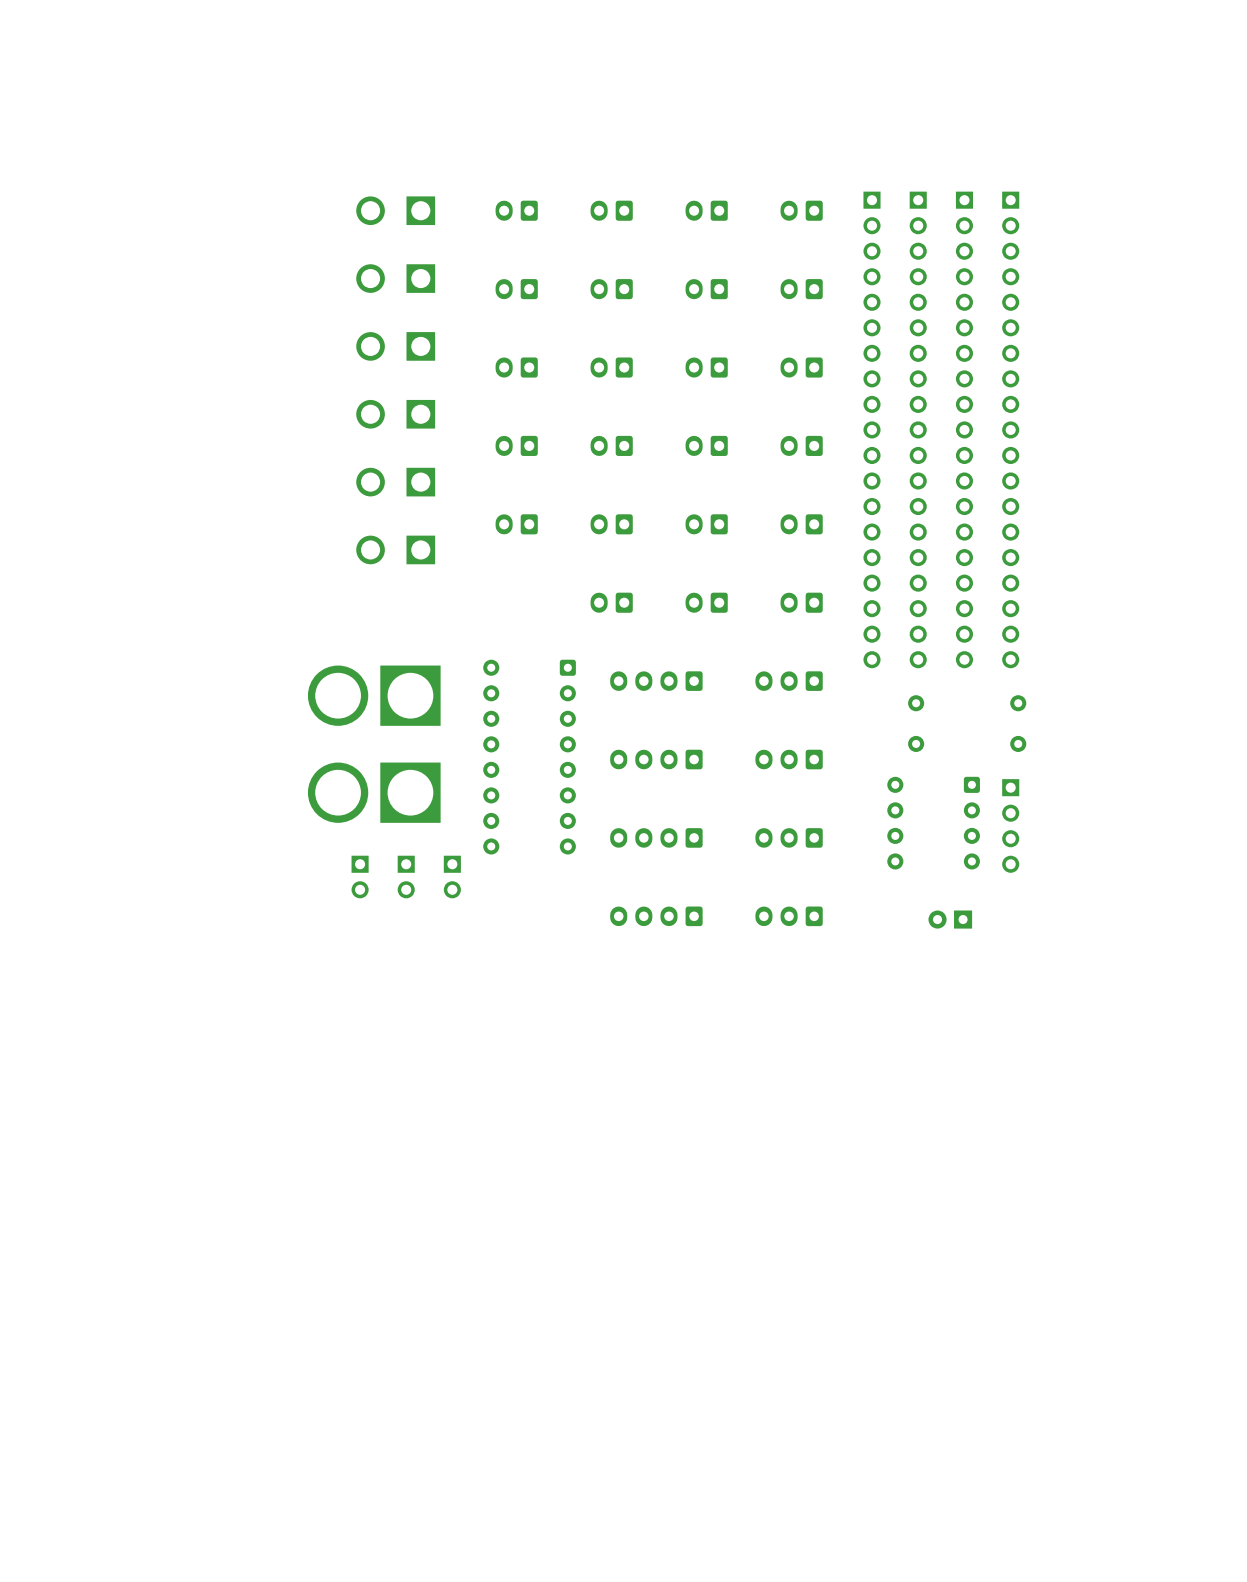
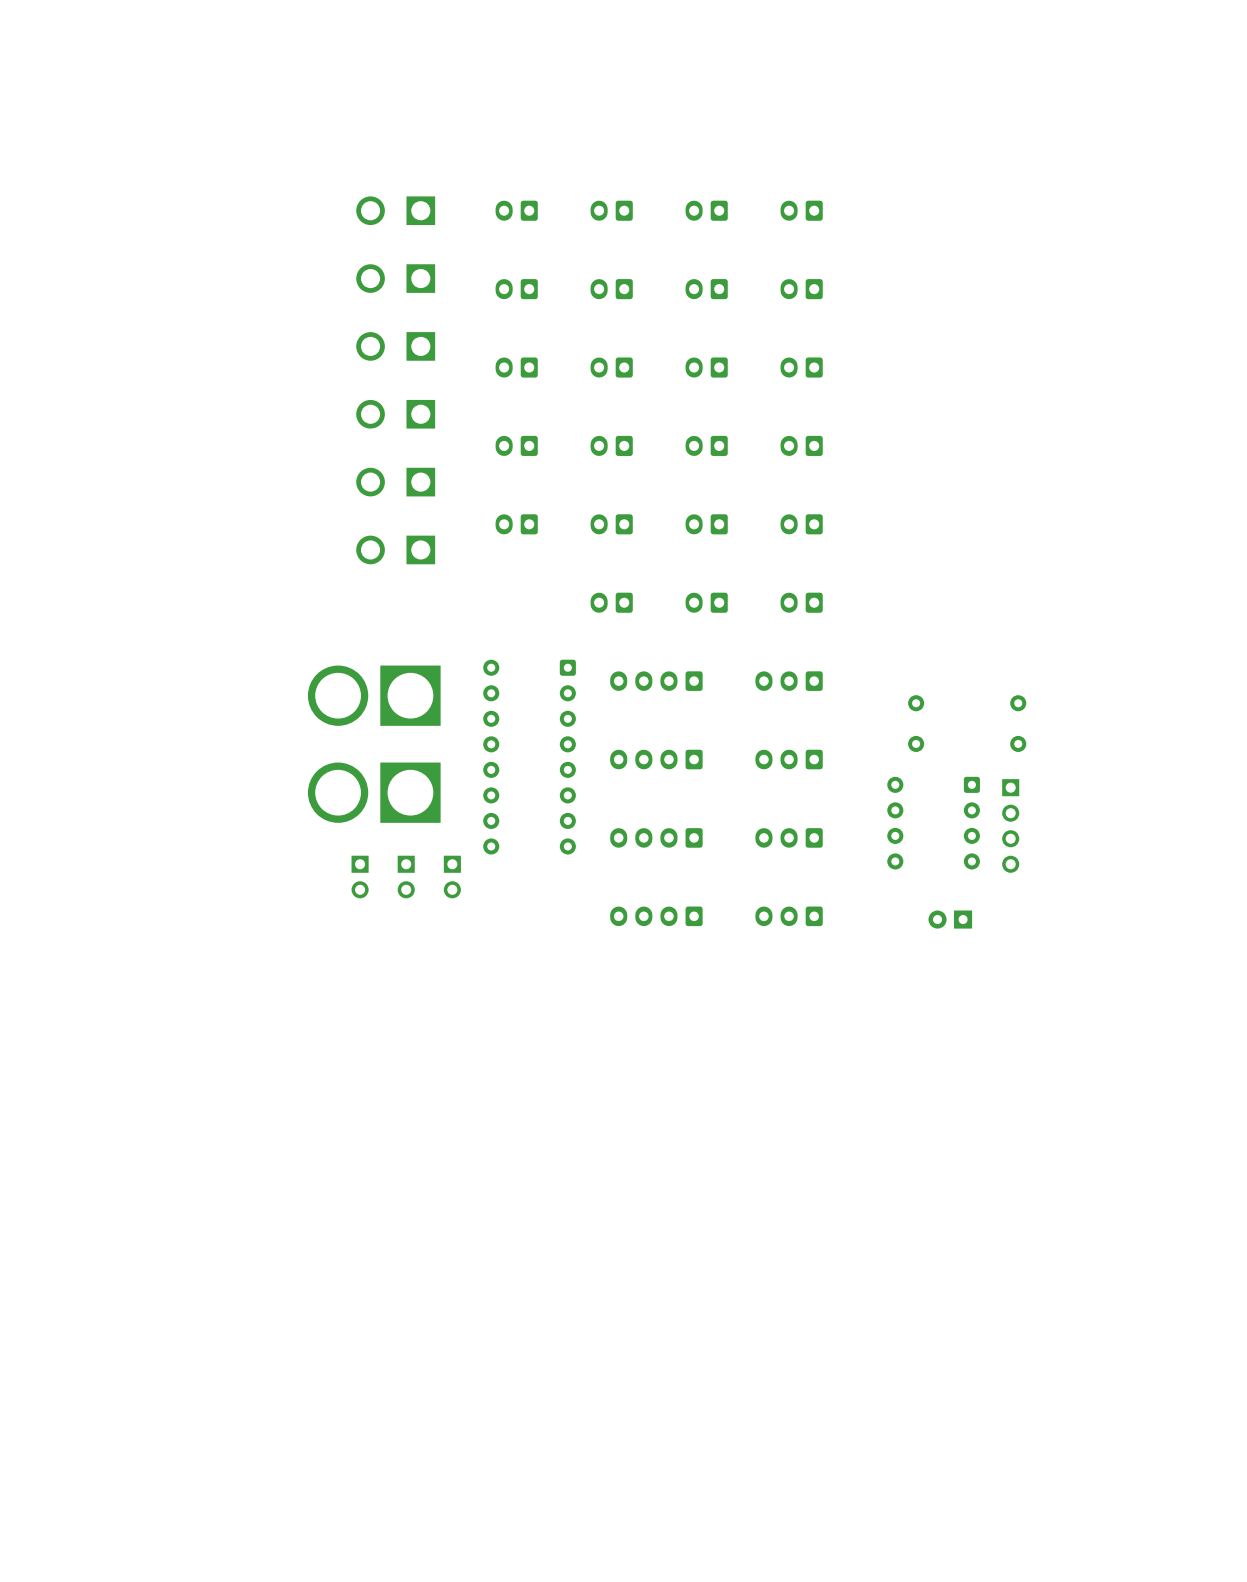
part: (872, 429) -> none
part: (918, 429) -> none
part: (964, 429) -> none
part: (1010, 429) -> none

